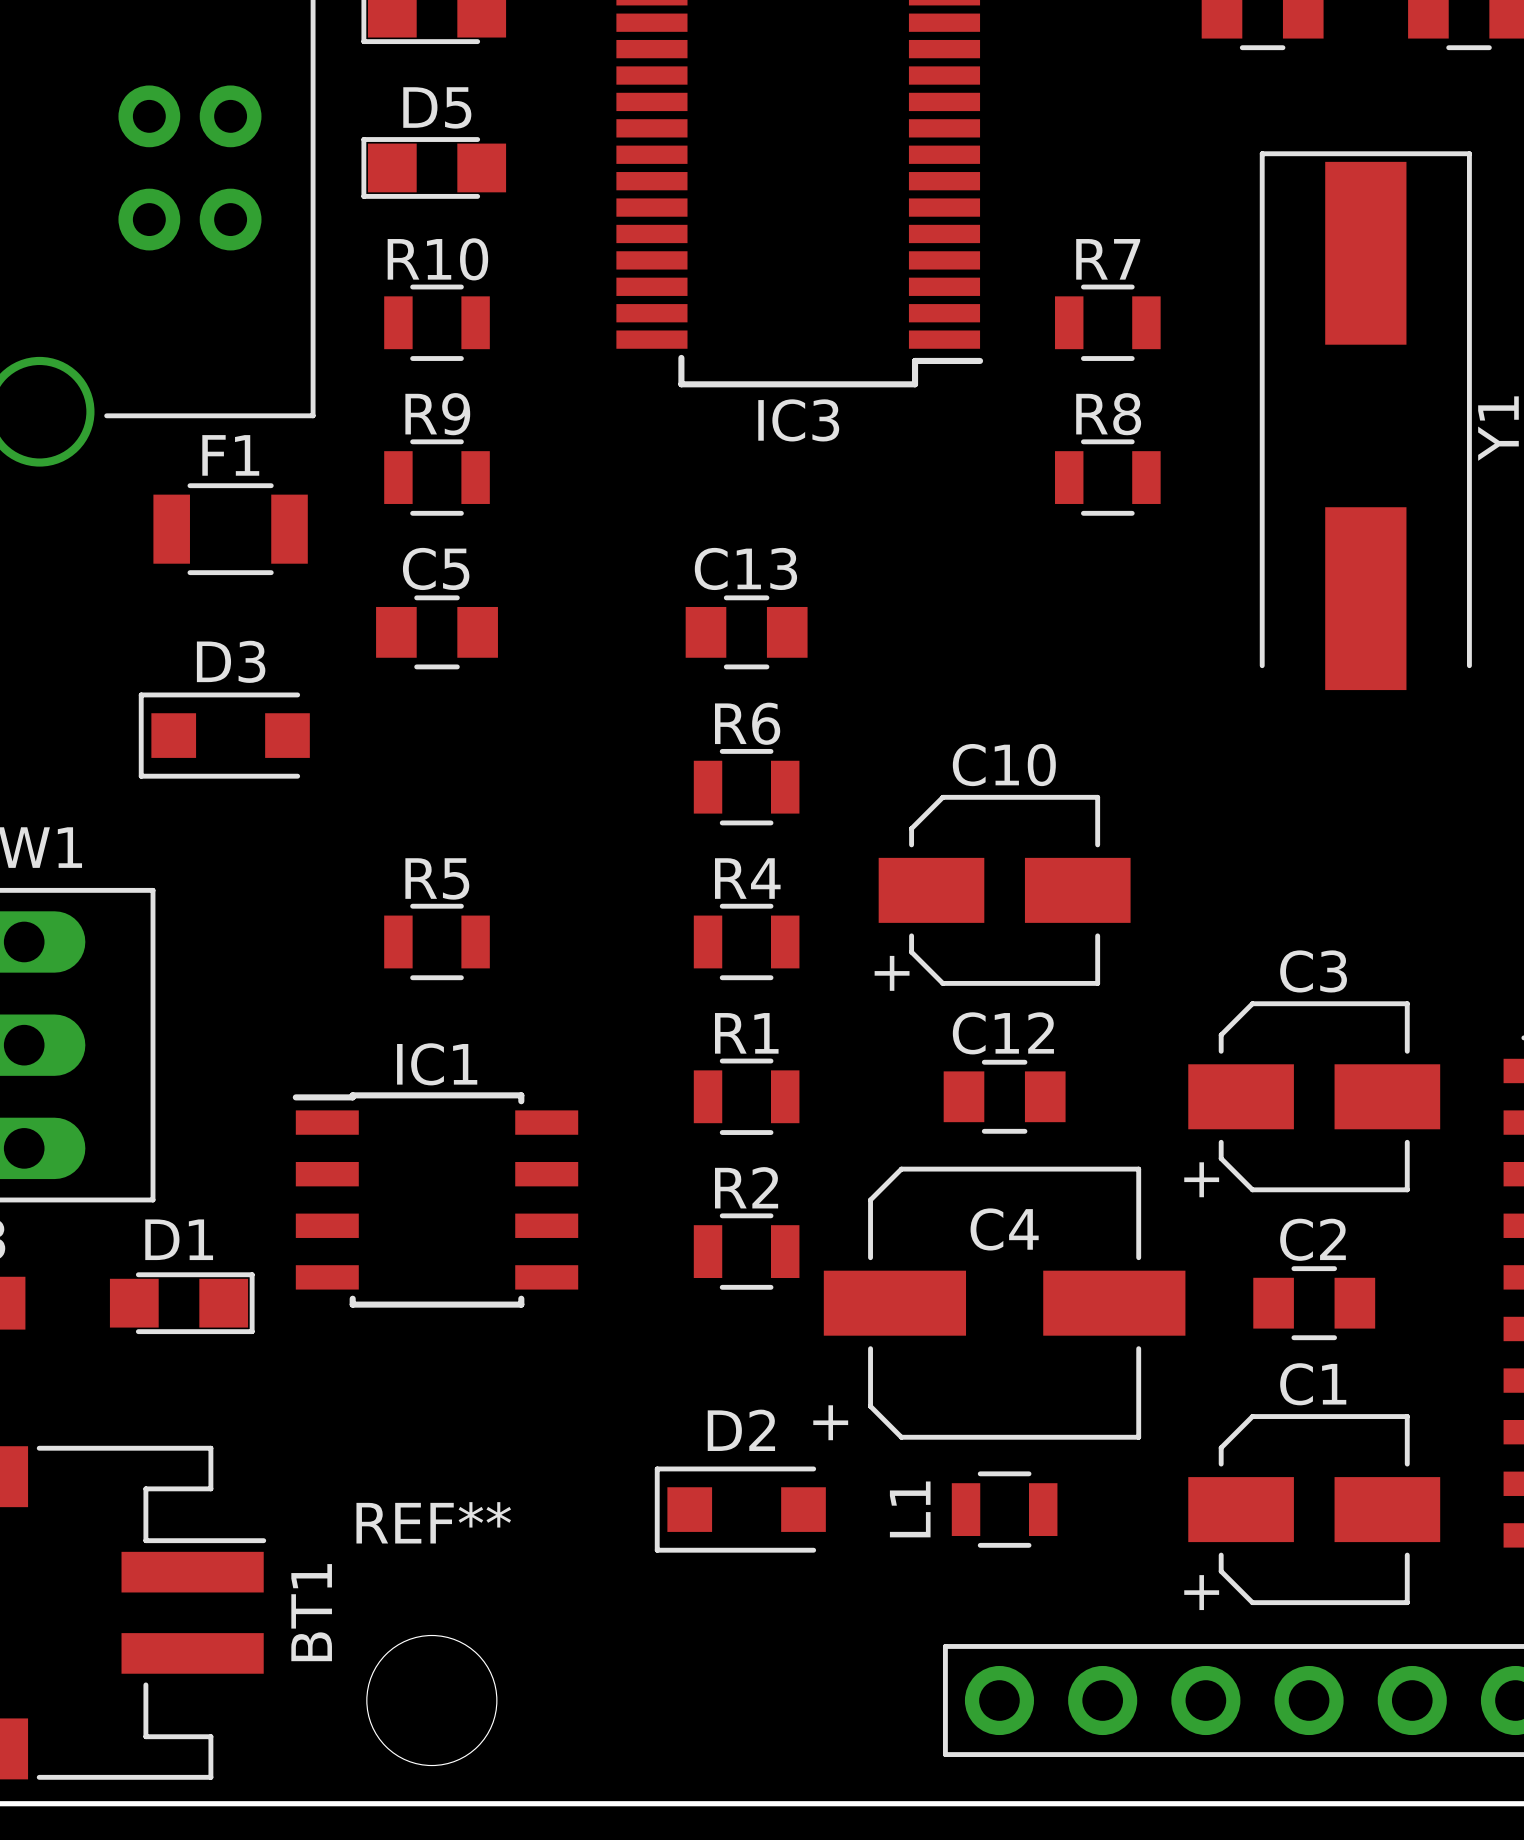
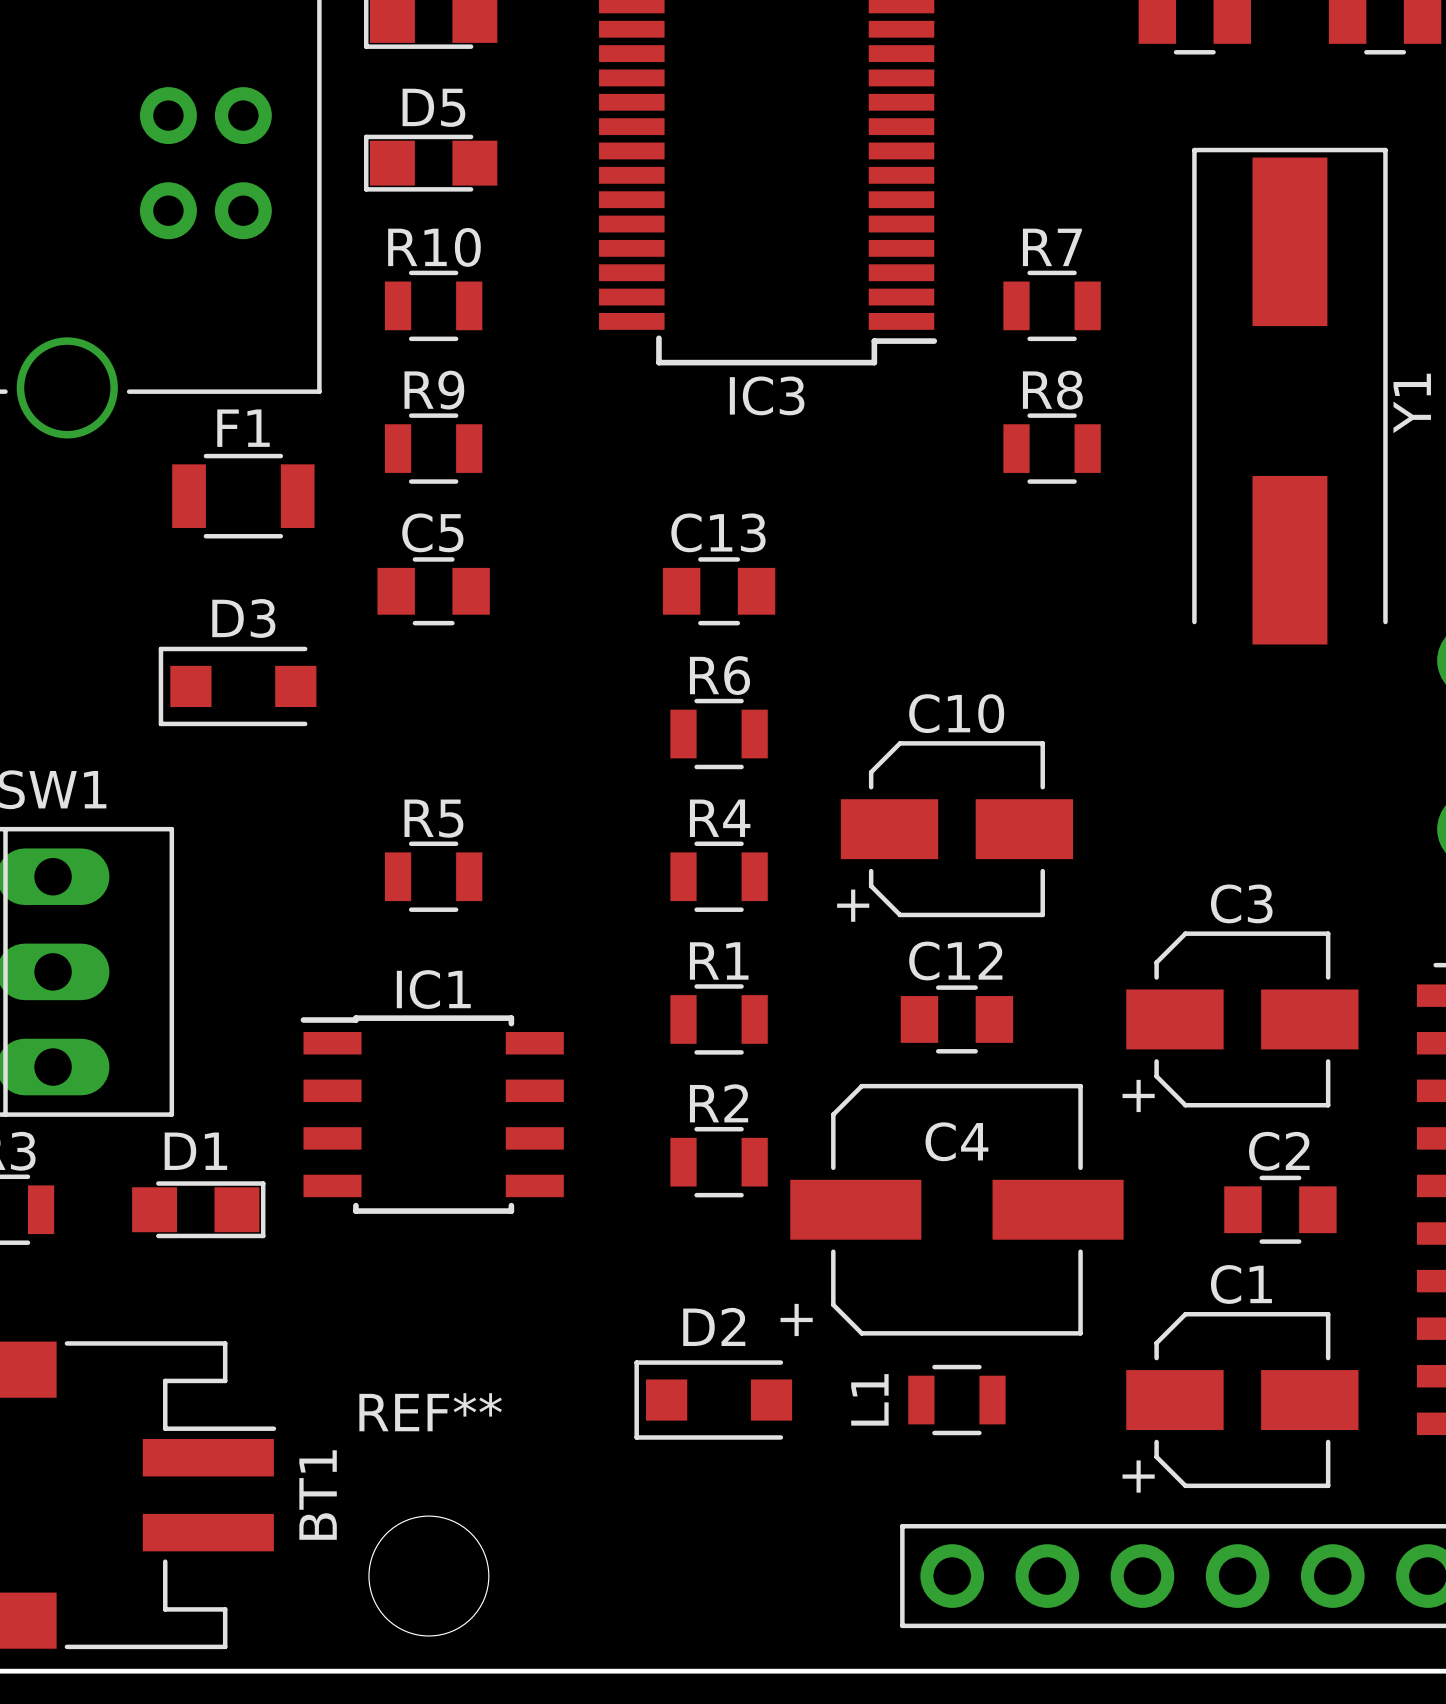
C2 position: (1314, 1303) -> (1280, 1209)

